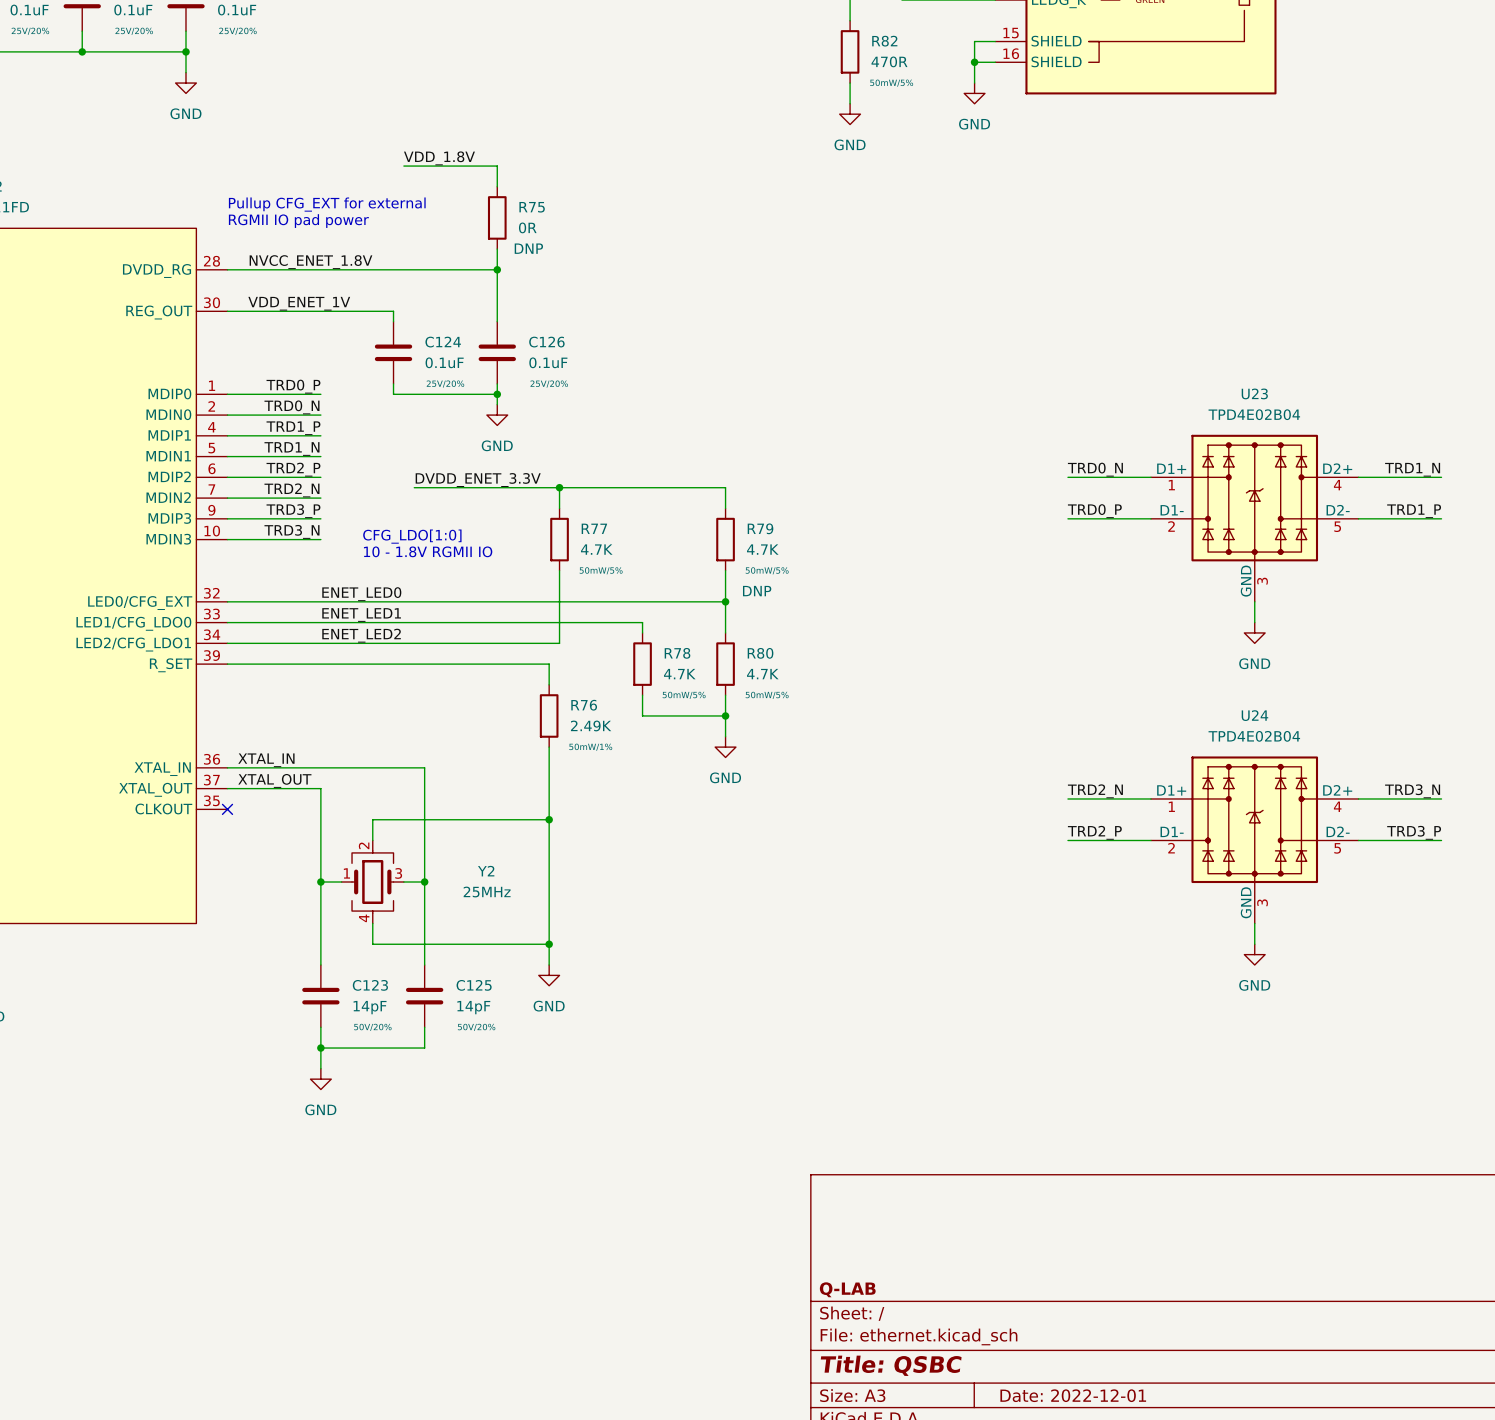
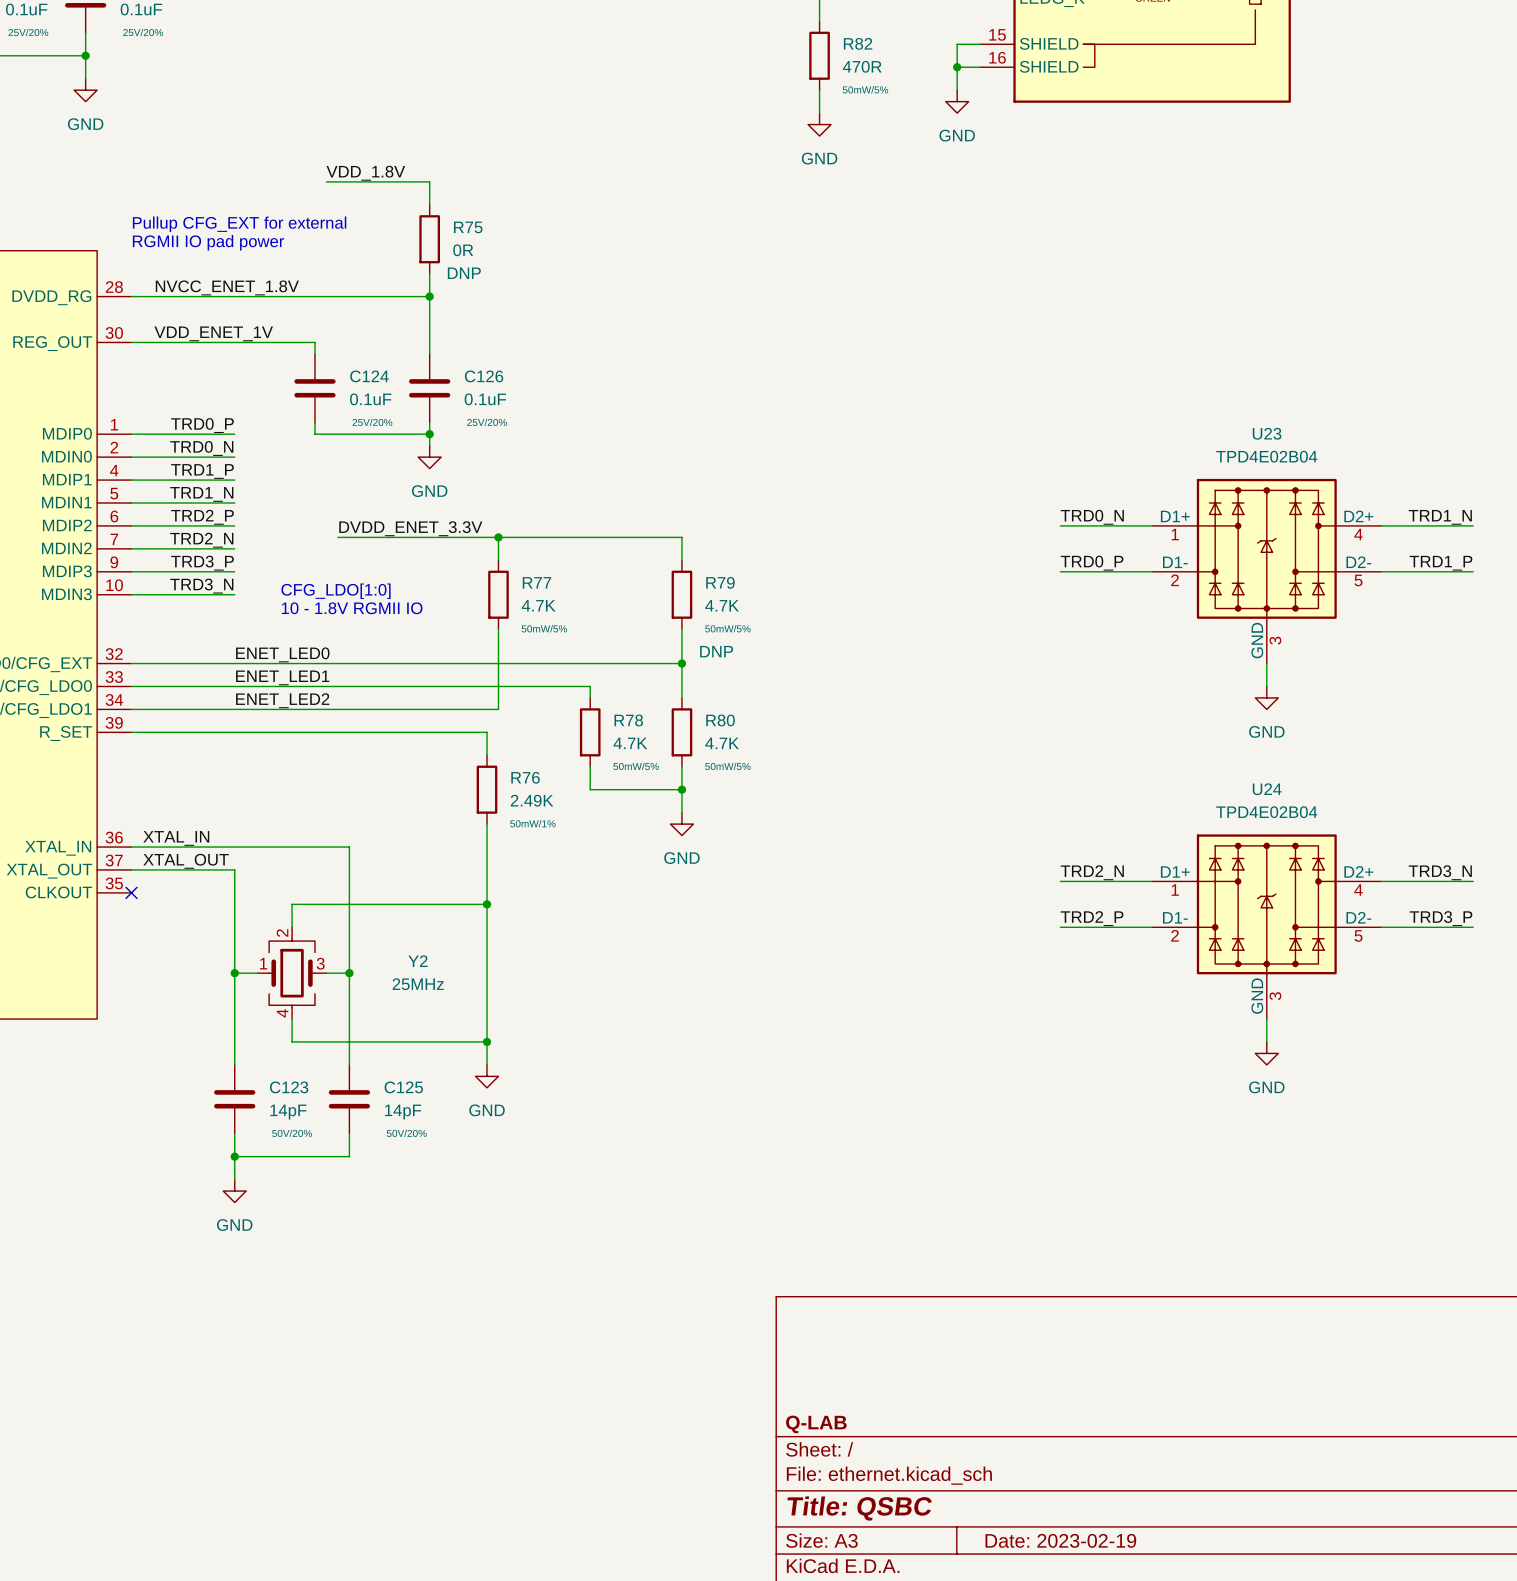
title block: Date: 2022-12-01 (1073, 1395) -> Date: 2023-02-19 (1060, 1540)

